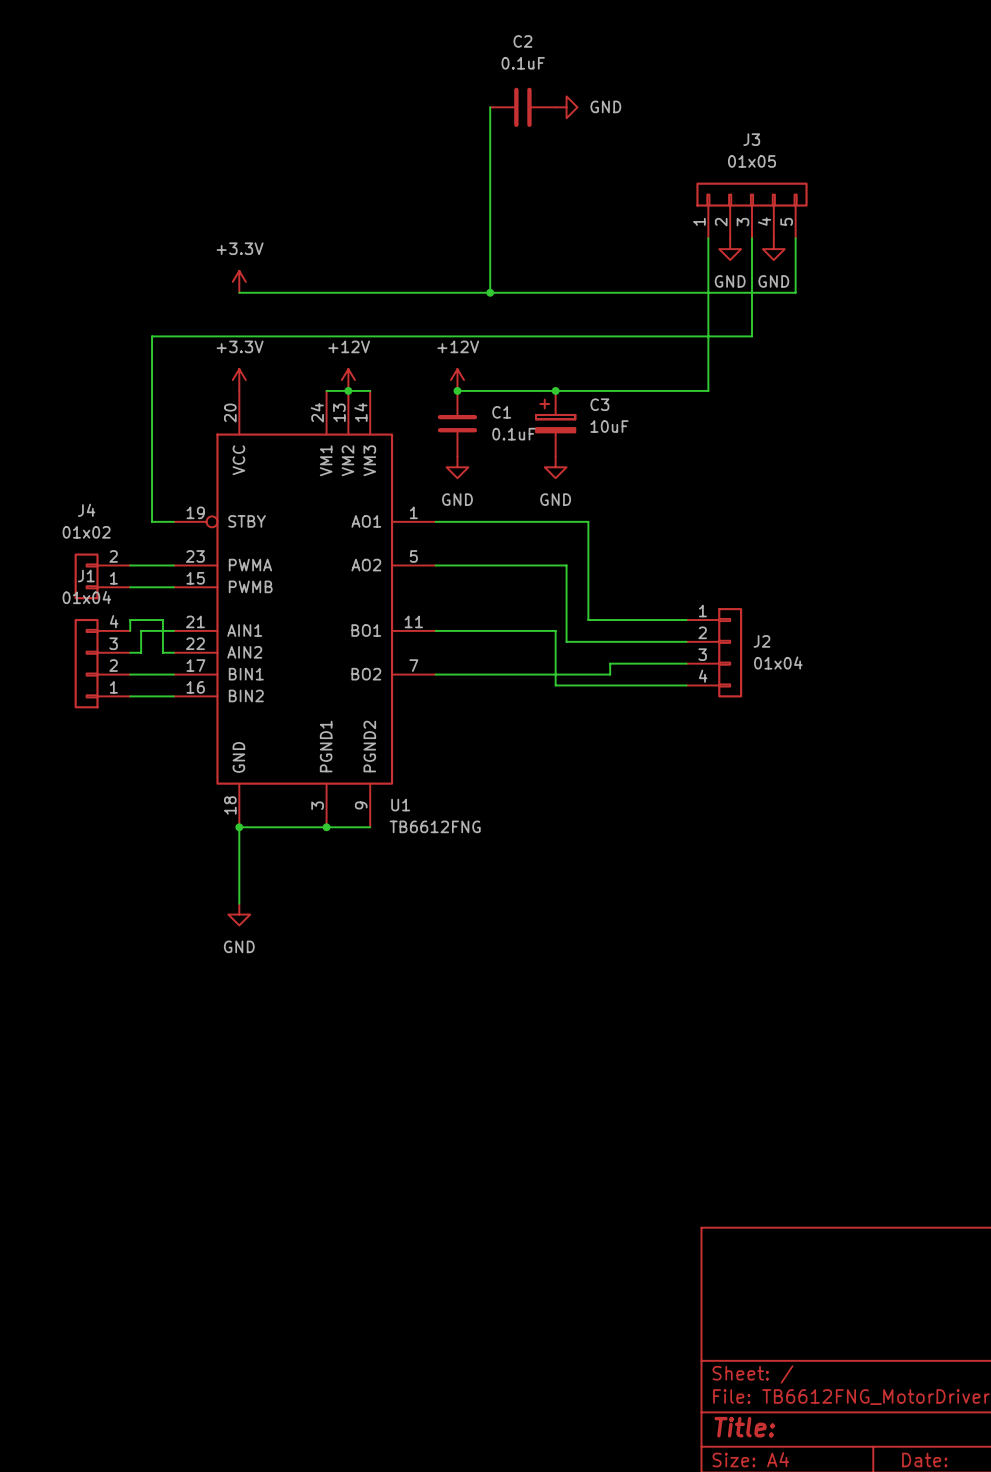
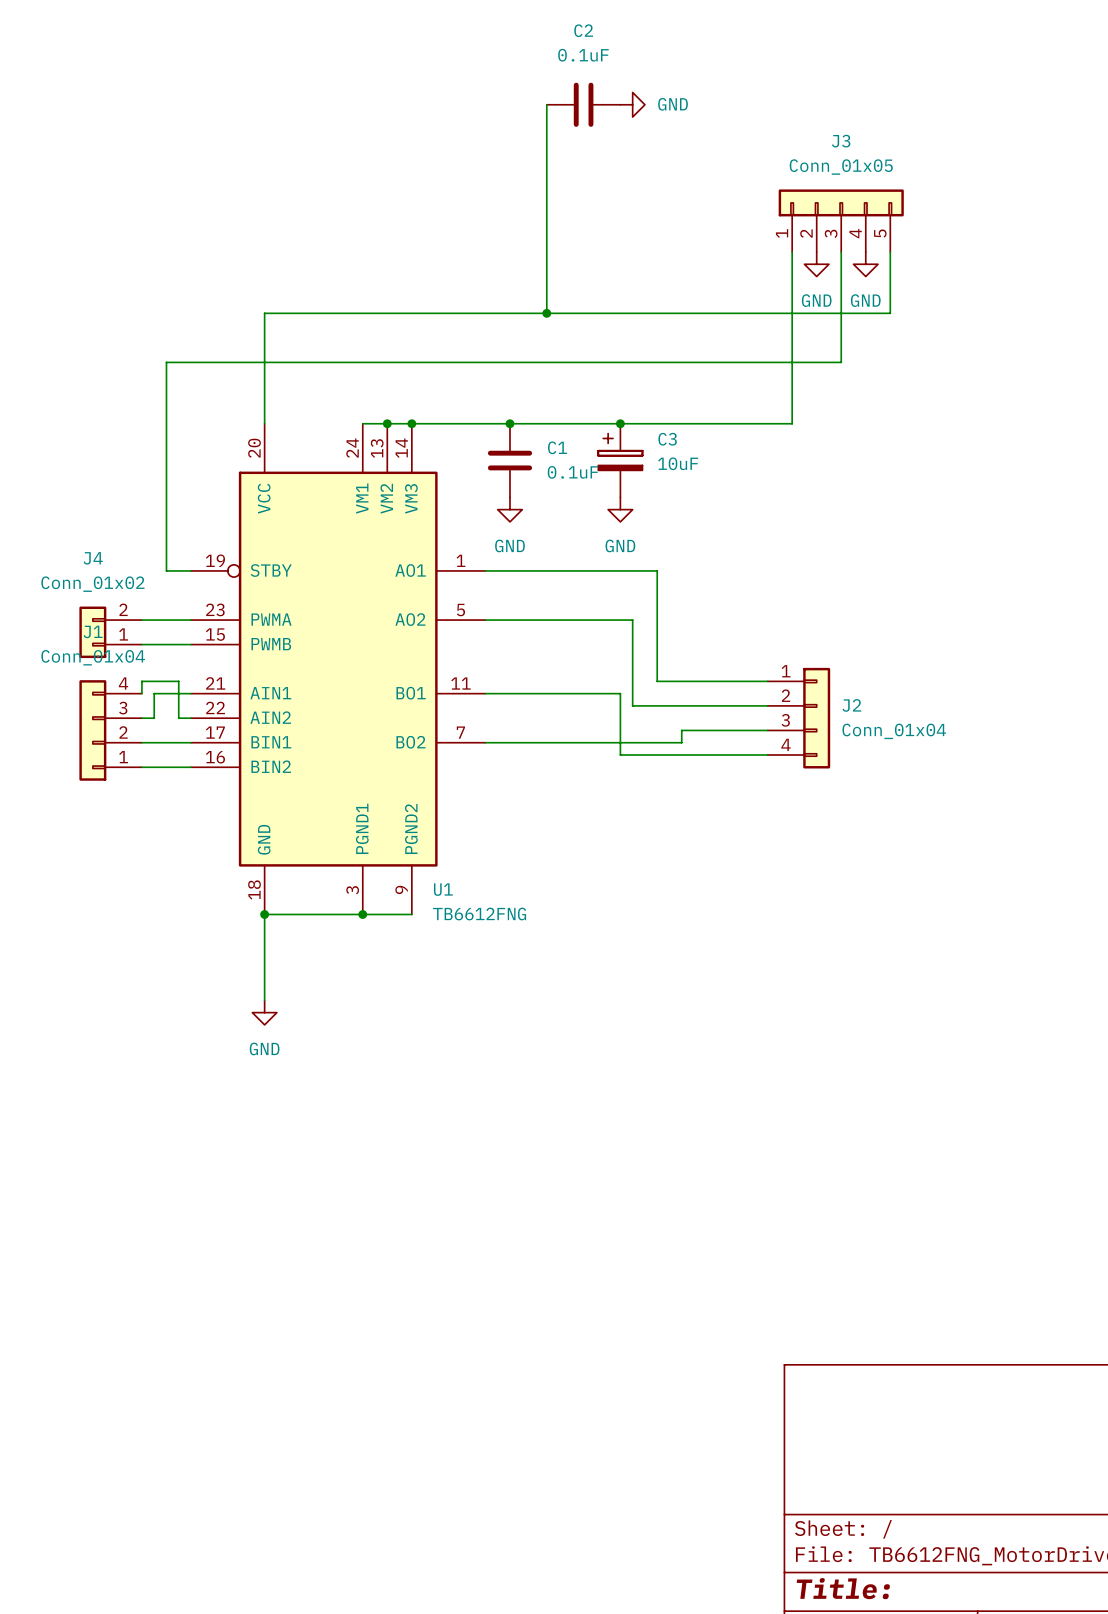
J3 value: 01x05 (752, 161) -> Conn_01x05 (841, 167)
power symbol: +3.3V (239, 281) -> none
wire: none -> (264, 313) (264, 423)
power symbol: +3.3V (239, 380) -> none
power symbol: +12V (348, 380) -> none
power symbol: +12V (457, 380) -> none
wire: none -> (411, 423) (509, 423)
junction: none -> (411, 423)
J4 value: 01x02 (86, 532) -> Conn_01x02 (92, 584)
J1 value: 01x04 (86, 597) -> Conn_01x04 (93, 657)
J2 value: 01x04 (778, 662) -> Conn_01x04 (894, 731)

